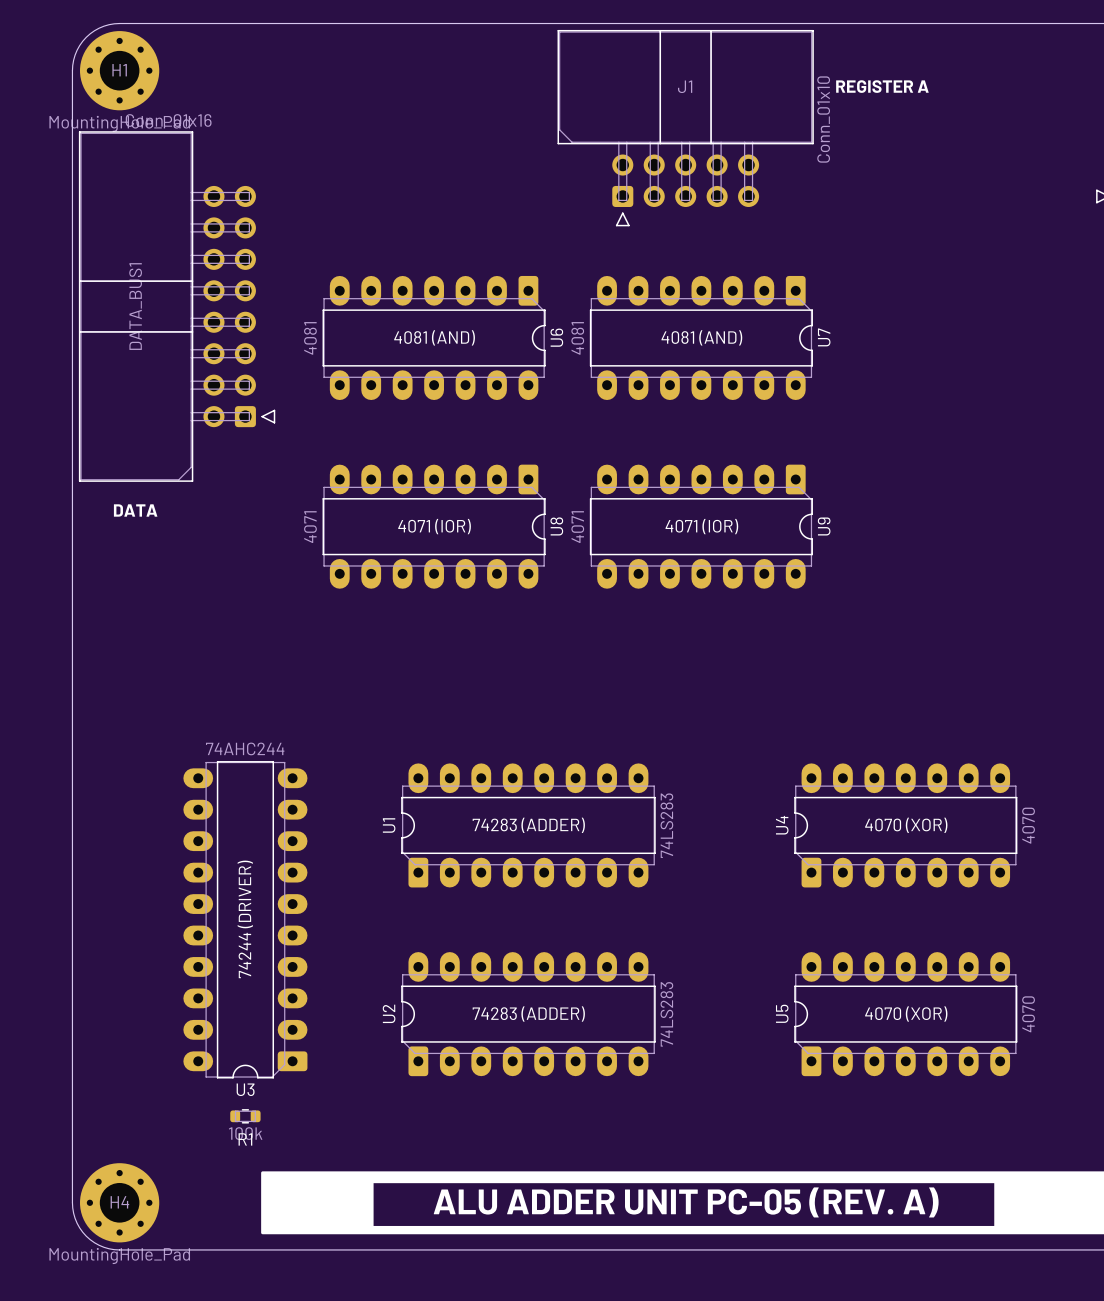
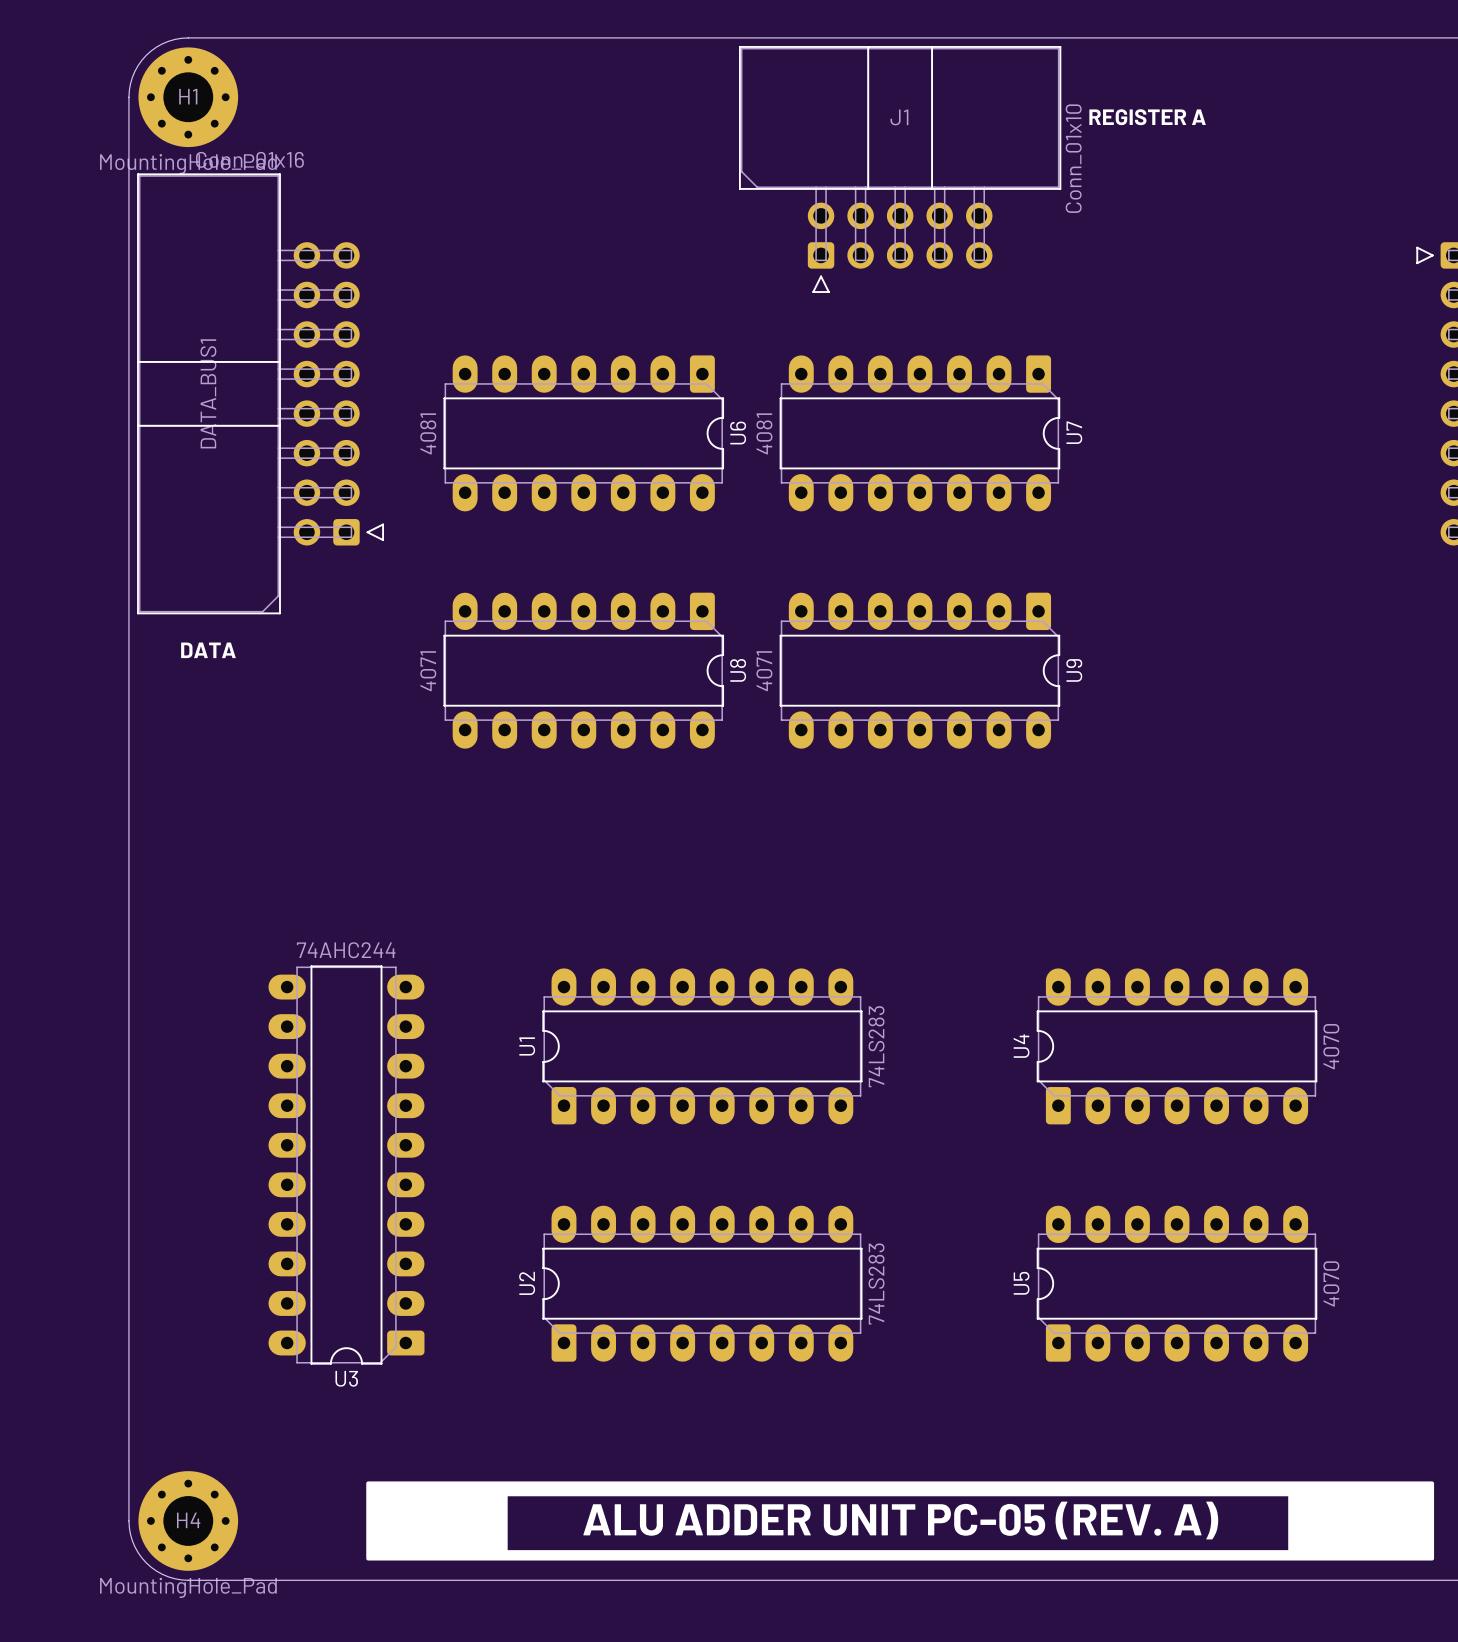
text: 4081 (AND) (434, 337) -> none
text: 4081 (AND) (701, 337) -> none
text: 4071 (IOR) (434, 526) -> none
text: 4071 (IOR) (701, 526) -> none
text: 74283 (ADDER) (528, 825) -> none
text: 4070 (XOR) (906, 825) -> none
text: 74244 (DRIVER) (245, 919) -> none
text: 74283 (ADDER) (528, 1014) -> none
text: 4070 (XOR) (906, 1014) -> none
R1: 100k (245, 1116) -> none

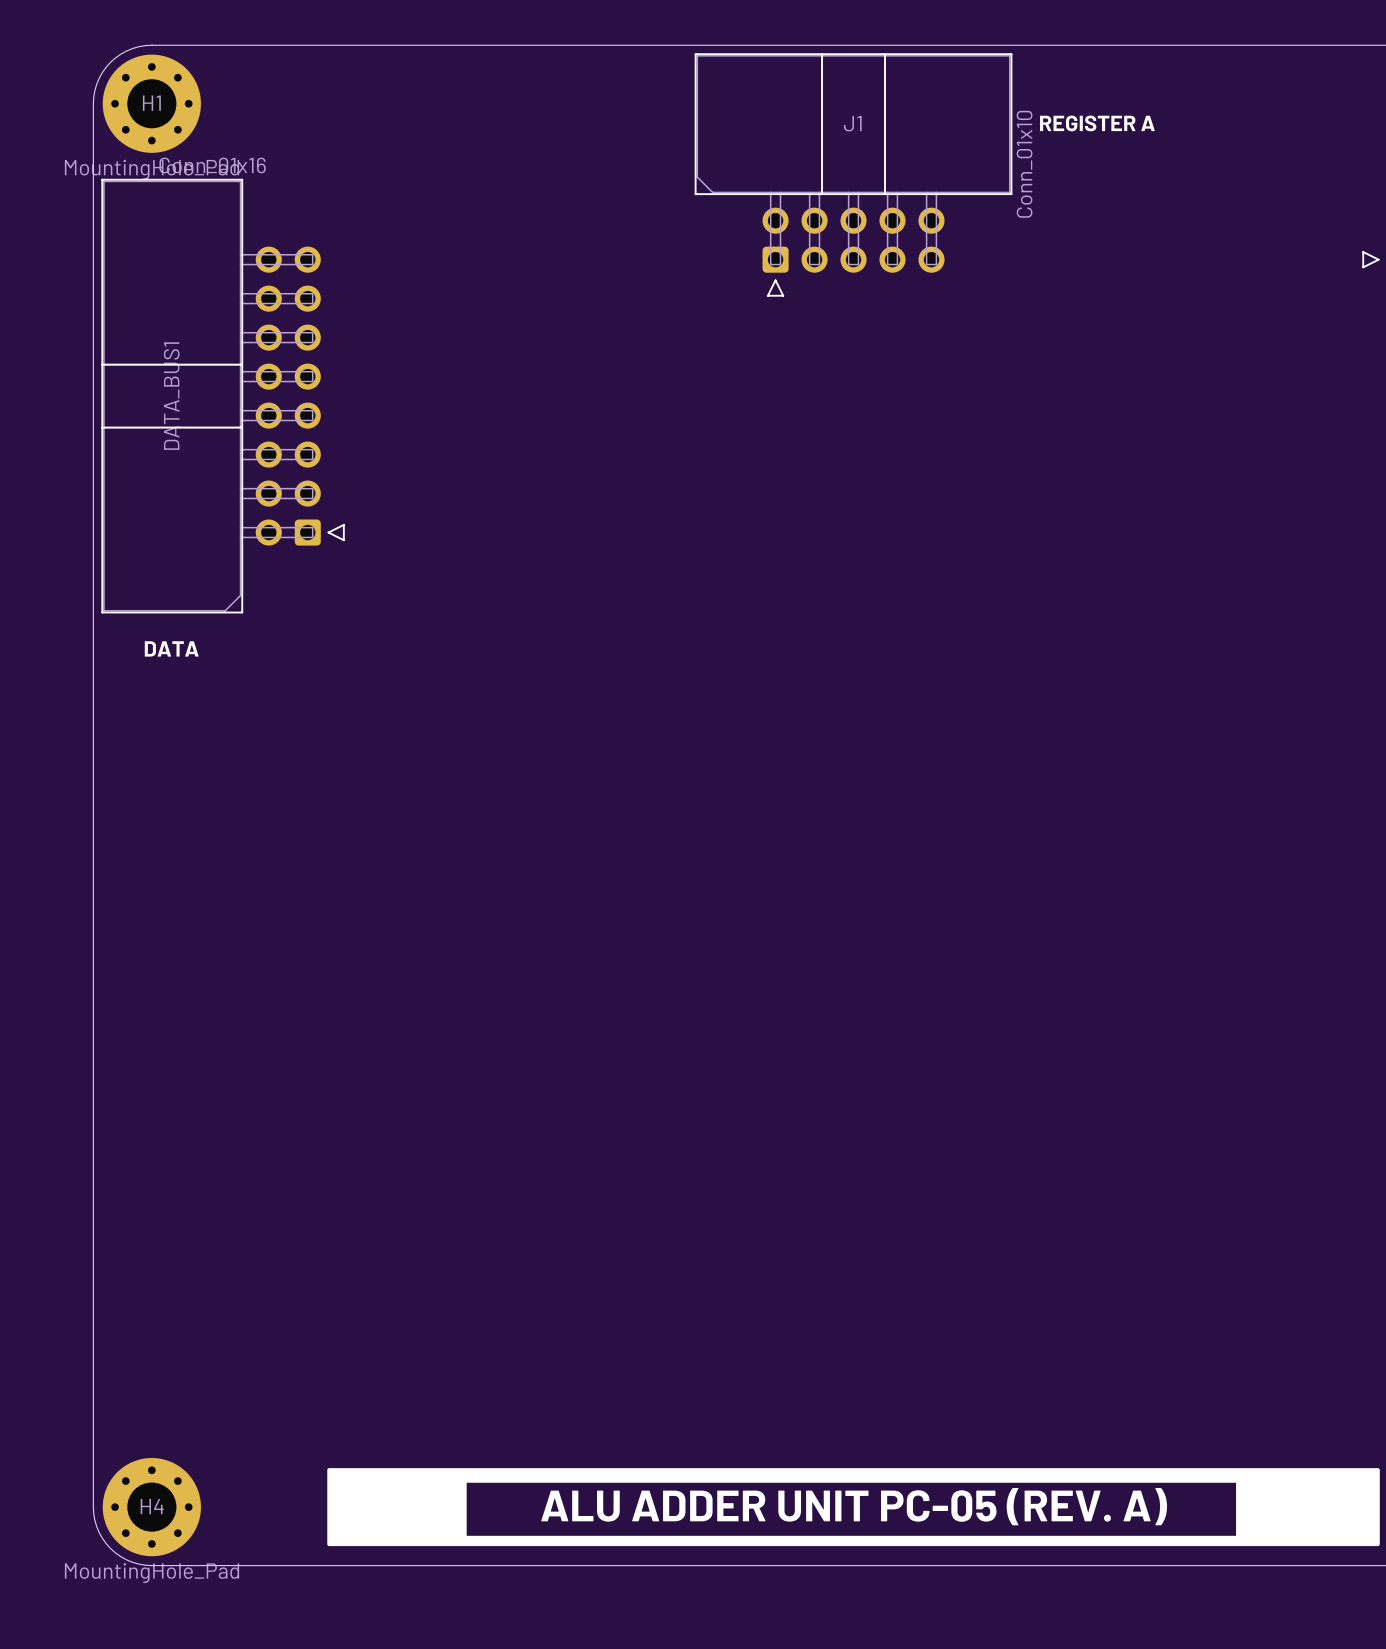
U6: 4081 (583, 433) -> none
U7: 4081 (919, 433) -> none
U8: 4071 (583, 670) -> none
U9: 4071 (919, 670) -> none
U1: 74LS283 (702, 1046) -> none
U4: 4070 (1176, 1046) -> none
U3: 74AHC244 (346, 1165) -> none
U2: 74LS283 (702, 1283) -> none
U5: 4070 (1176, 1283) -> none

